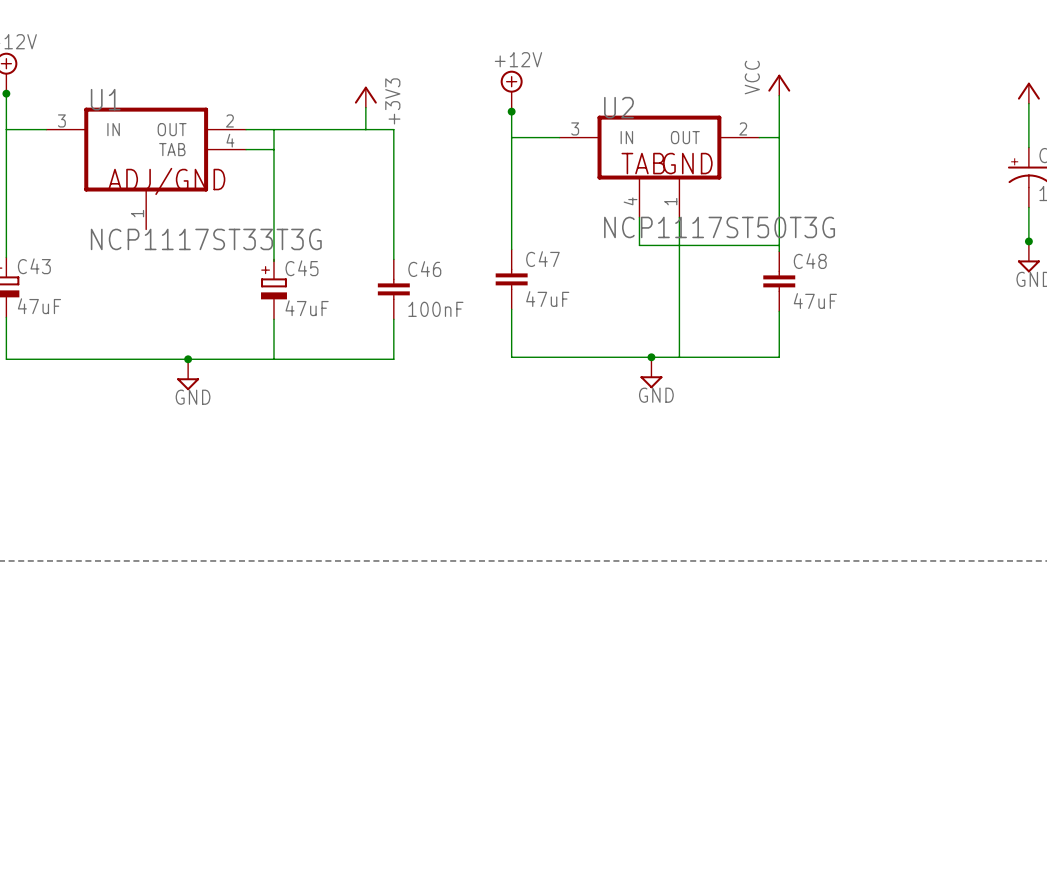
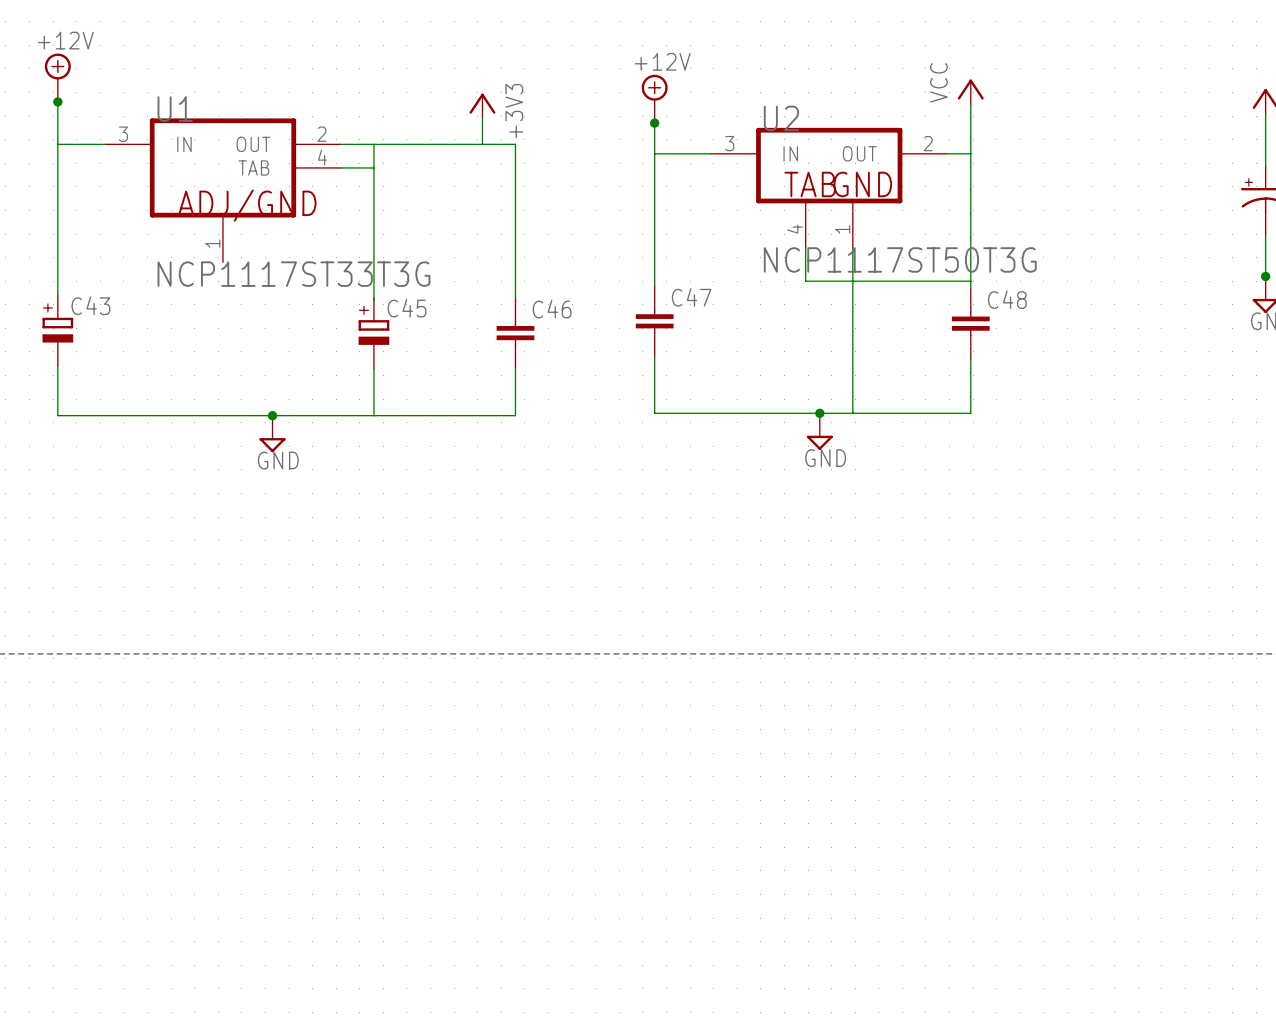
C47 value: 47uF (547, 299) -> none
C48 value: 47uF (815, 301) -> none
C43 value: 47uF (39, 306) -> none
C45 value: 47uF (307, 308) -> none
C46 value: 100nF (435, 309) -> none

